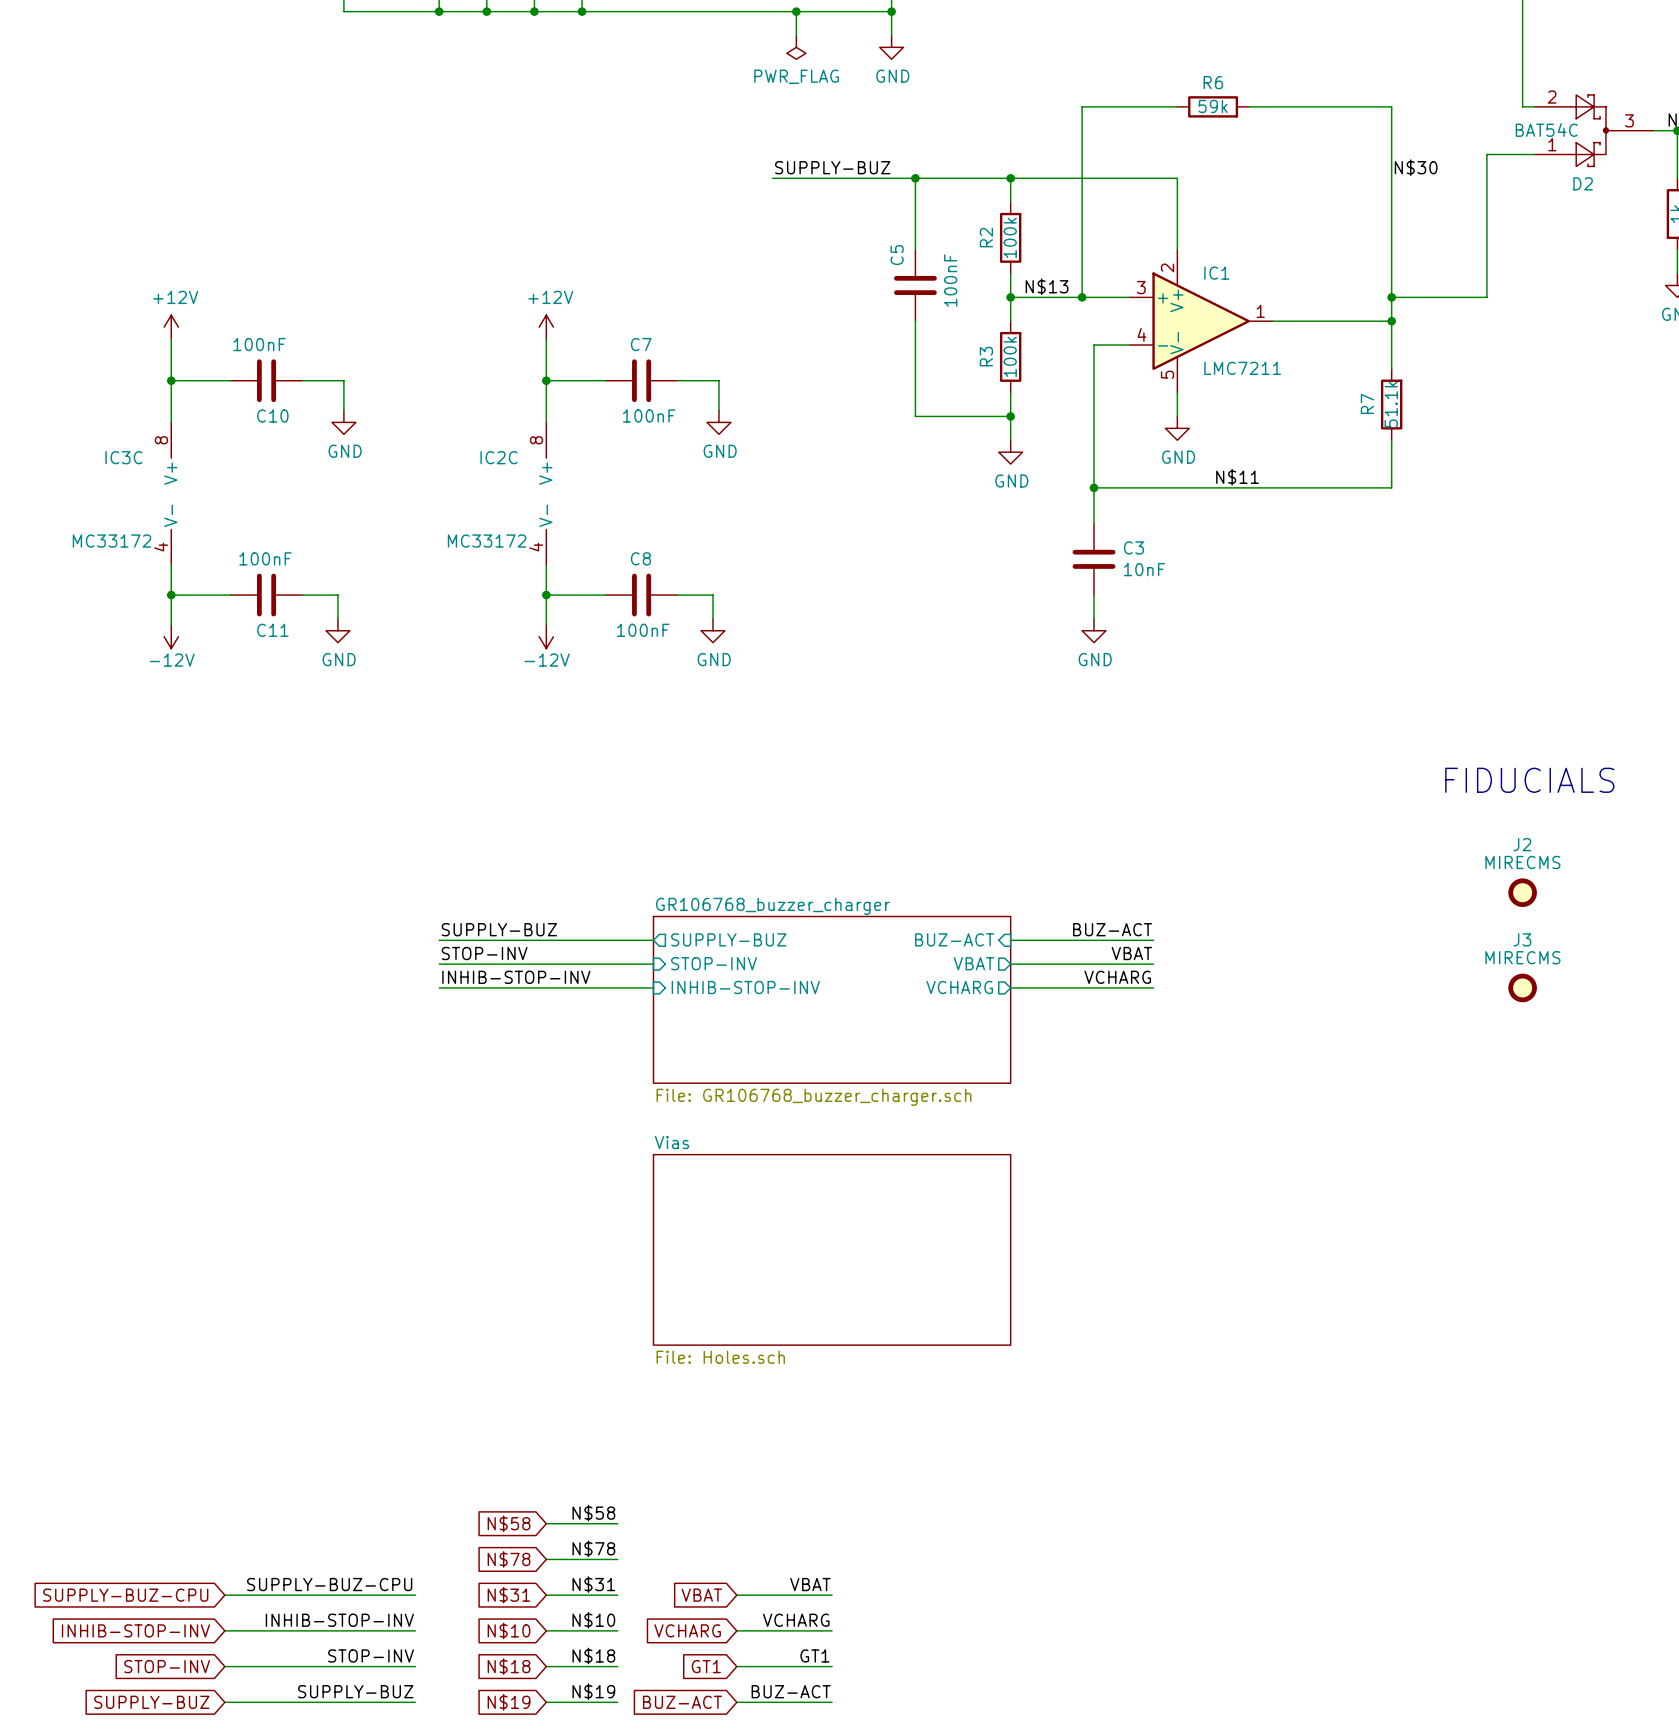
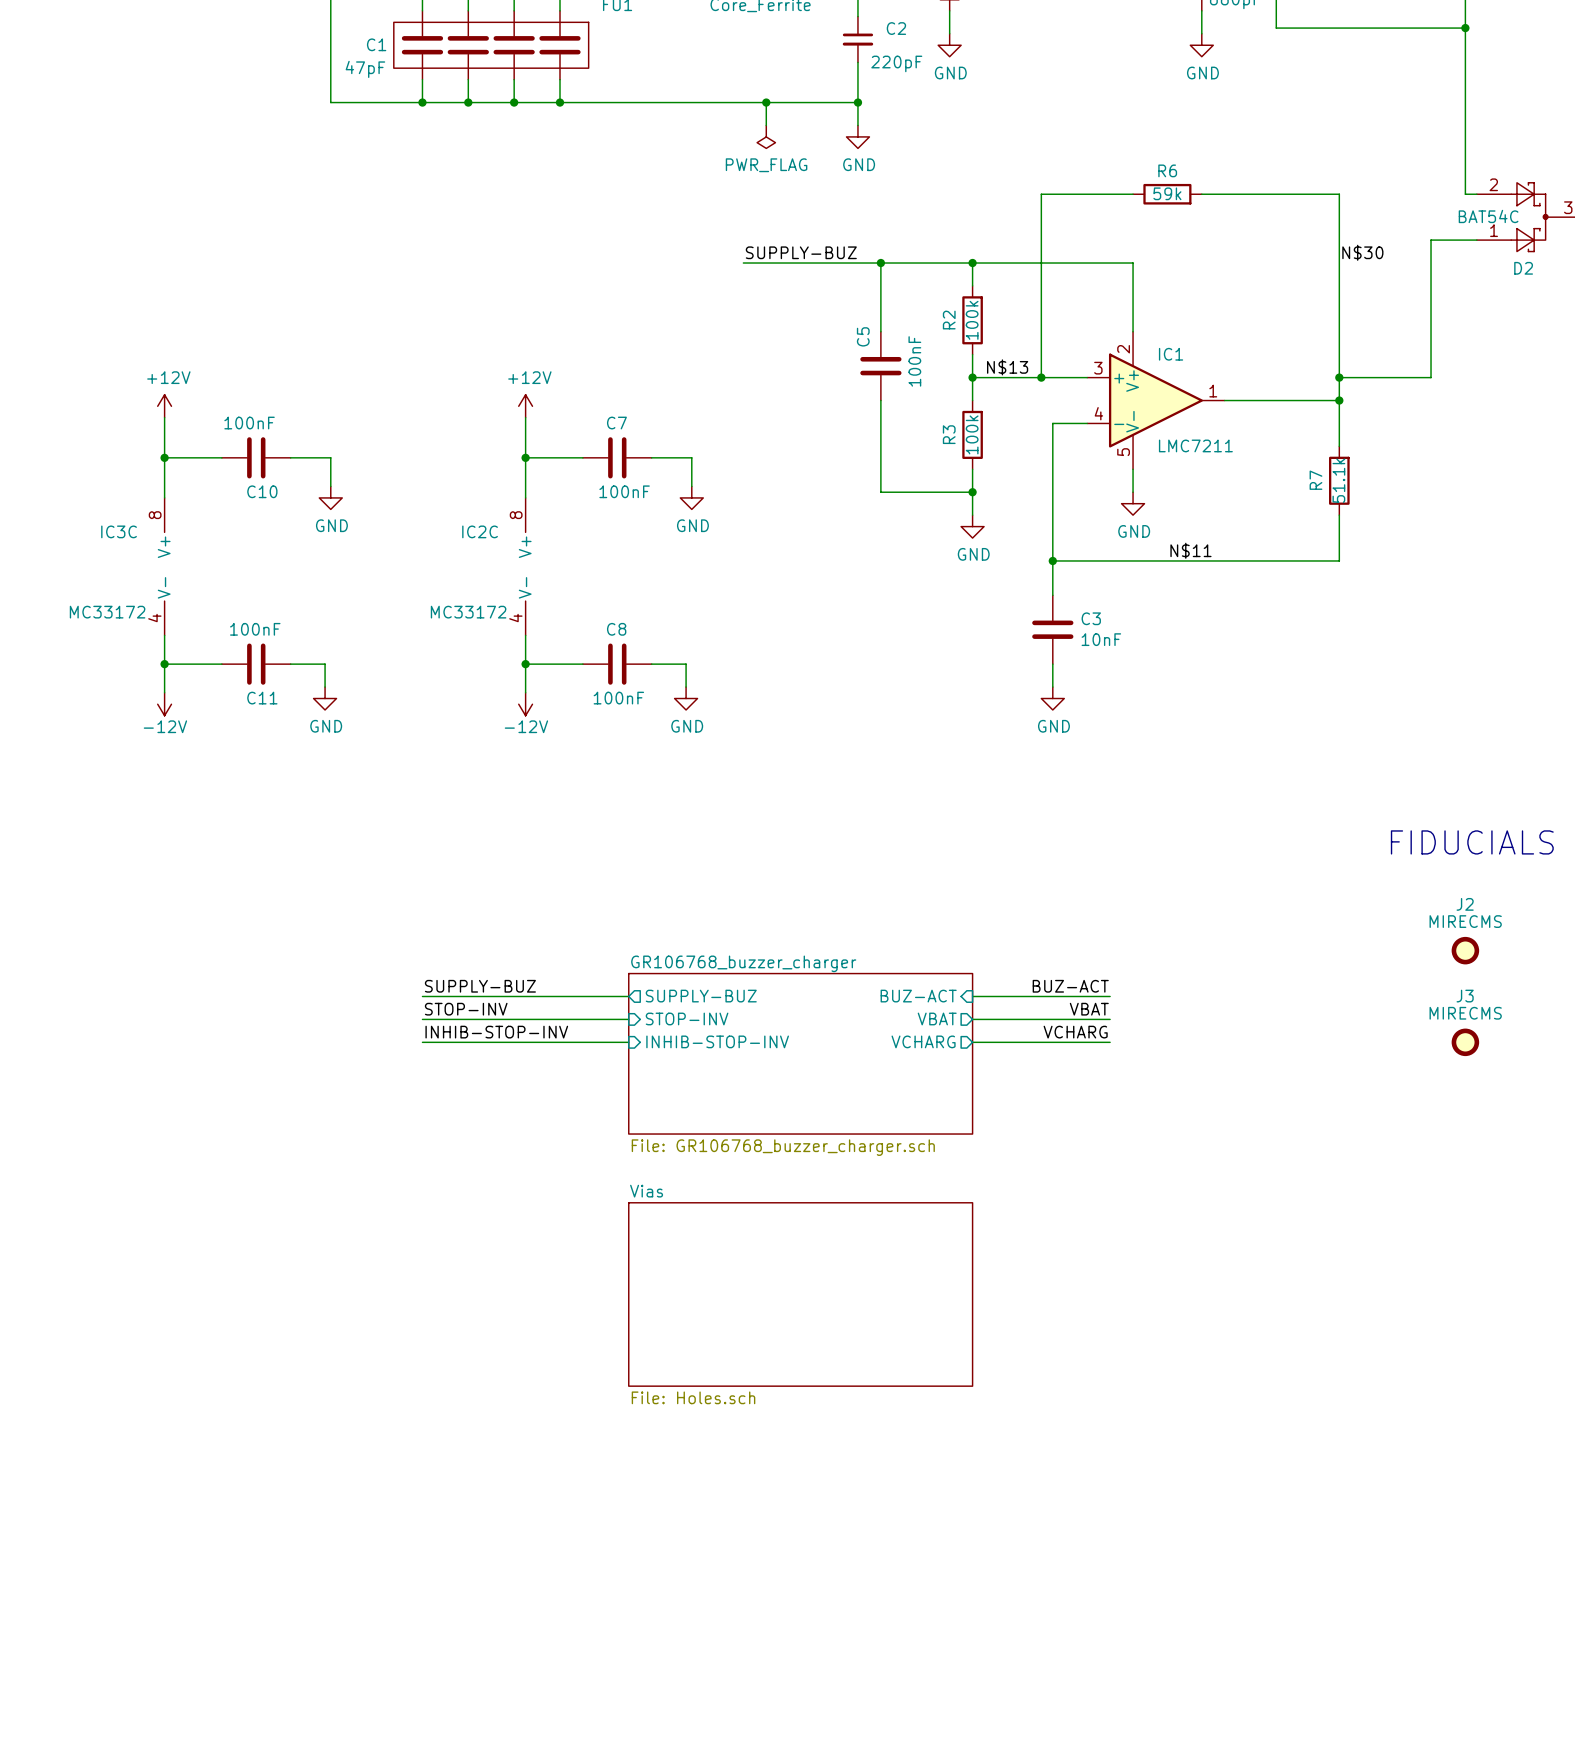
label: N$58 (593, 1513) -> none
global label: N$58 (509, 1523) -> none
wire: (546, 1523) (617, 1523) -> none
label: N$78 (593, 1548) -> none
global label: N$78 (509, 1559) -> none
wire: (546, 1559) (617, 1559) -> none
label: SUPPLY-BUZ-CPU (329, 1584) -> none
label: N$31 (593, 1584) -> none
label: VBAT (810, 1584) -> none
global label: SUPPLY-BUZ-CPU (125, 1595) -> none
wire: (224, 1595) (415, 1595) -> none
global label: N$31 (509, 1595) -> none
wire: (546, 1595) (617, 1595) -> none
global label: VBAT (701, 1595) -> none
wire: (736, 1595) (832, 1595) -> none
label: INHIB-STOP-INV (339, 1620) -> none
label: N$10 (593, 1620) -> none
label: VCHARG (796, 1620) -> none
global label: INHIB-STOP-INV (135, 1630) -> none
wire: (224, 1630) (415, 1630) -> none
global label: N$10 (509, 1630) -> none
wire: (546, 1630) (617, 1630) -> none
global label: VCHARG (687, 1630) -> none
wire: (736, 1630) (832, 1630) -> none
label: STOP-INV (371, 1655) -> none
label: N$18 (593, 1655) -> none
label: GT1 (814, 1655) -> none
global label: STOP-INV (167, 1666) -> none
wire: (224, 1666) (415, 1666) -> none
global label: N$18 (509, 1666) -> none
wire: (546, 1666) (617, 1666) -> none
global label: GT1 (706, 1666) -> none
wire: (736, 1666) (832, 1666) -> none
label: SUPPLY-BUZ (355, 1691) -> none
label: N$19 (593, 1691) -> none
label: BUZ-ACT (791, 1691) -> none
global label: SUPPLY-BUZ (151, 1702) -> none
wire: (224, 1702) (415, 1702) -> none
global label: N$19 (509, 1702) -> none
wire: (546, 1702) (617, 1702) -> none
global label: BUZ-ACT (682, 1702) -> none
wire: (736, 1702) (832, 1702) -> none

